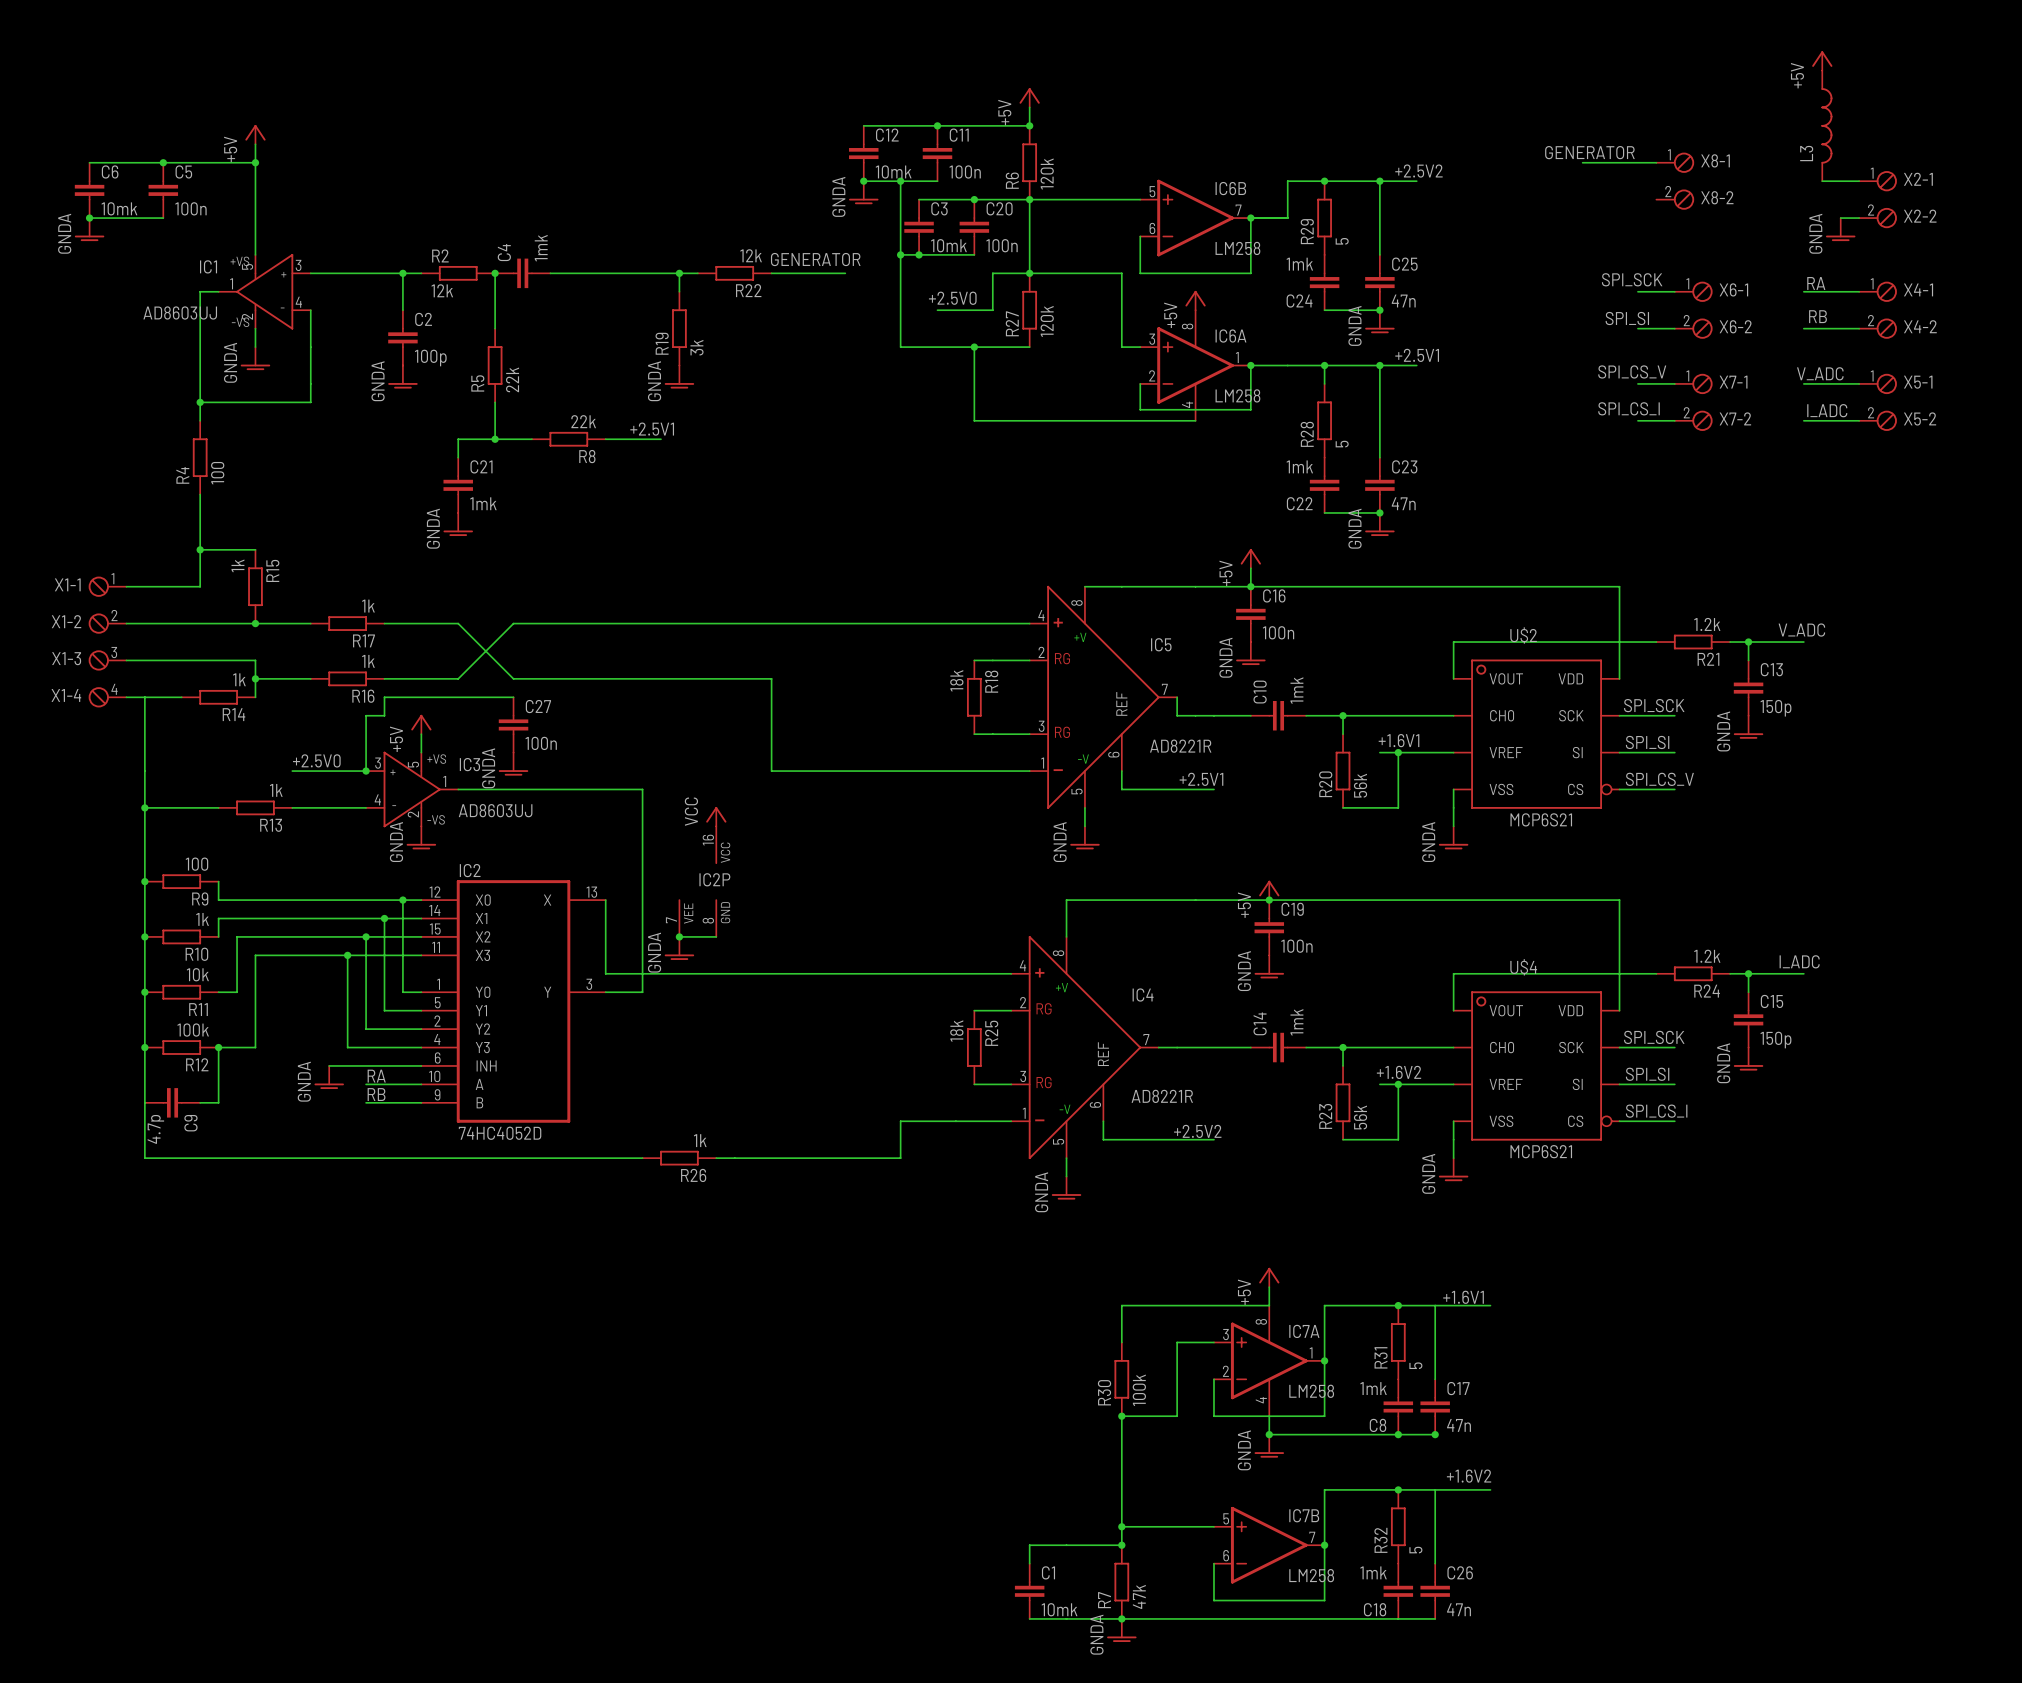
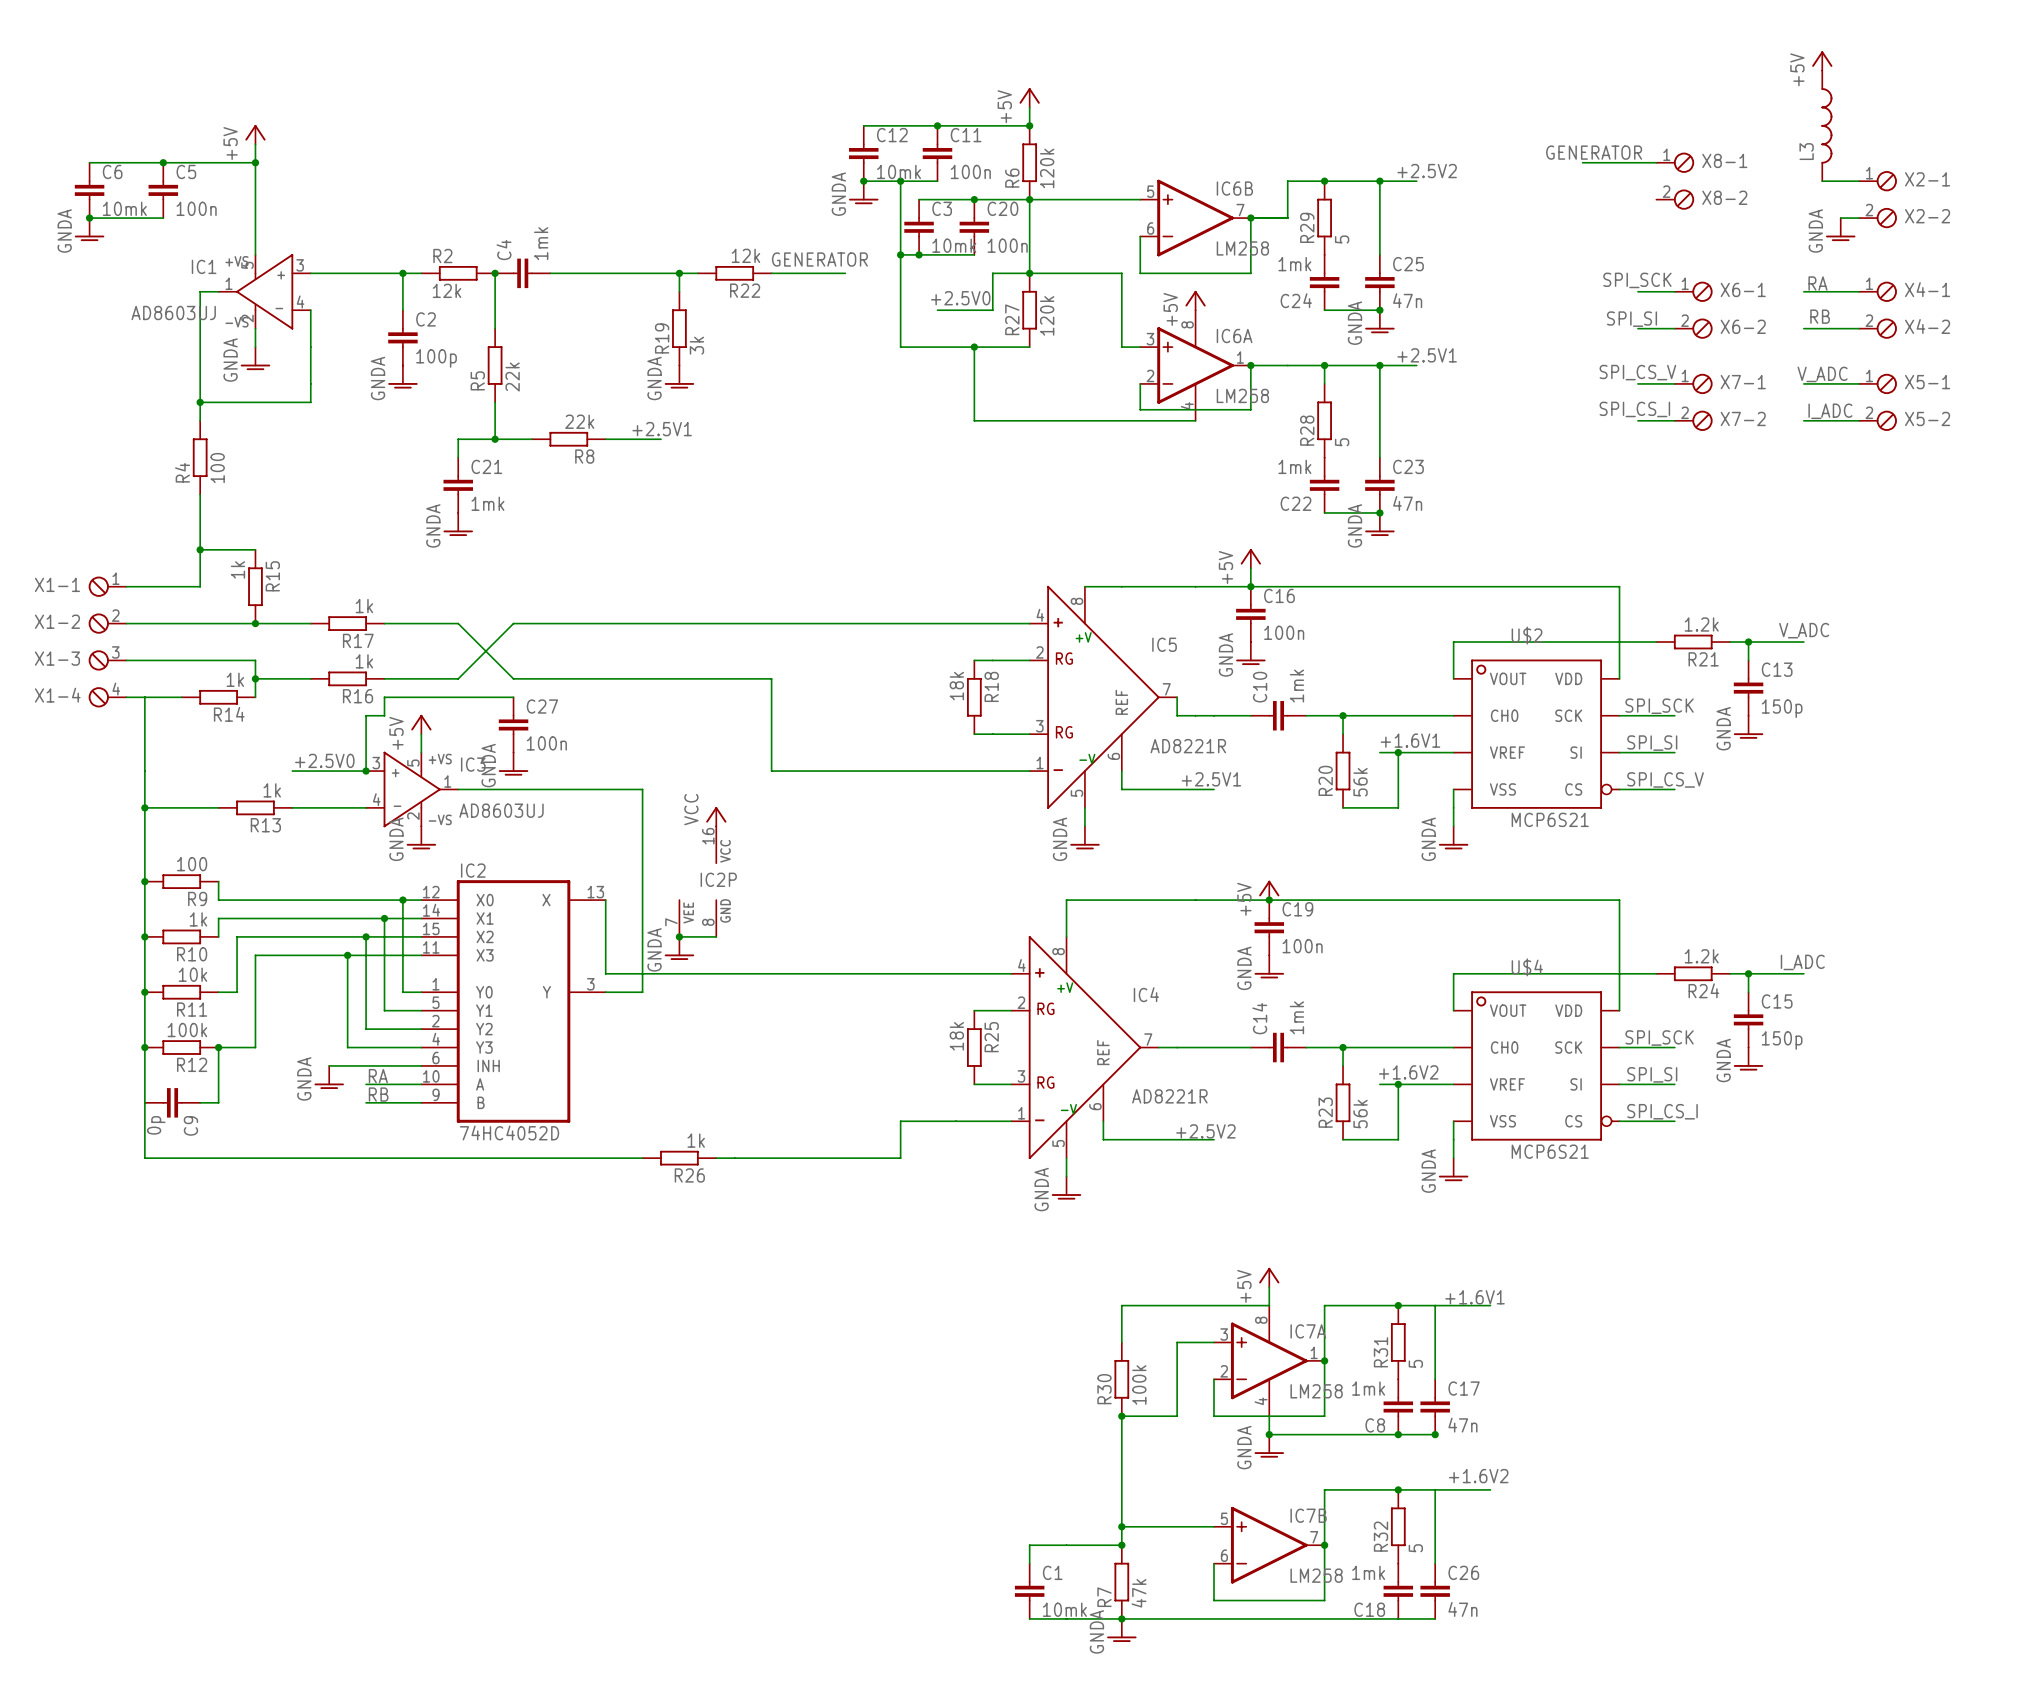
C9 value: 4.7p (155, 1129) -> 0p (156, 1125)

